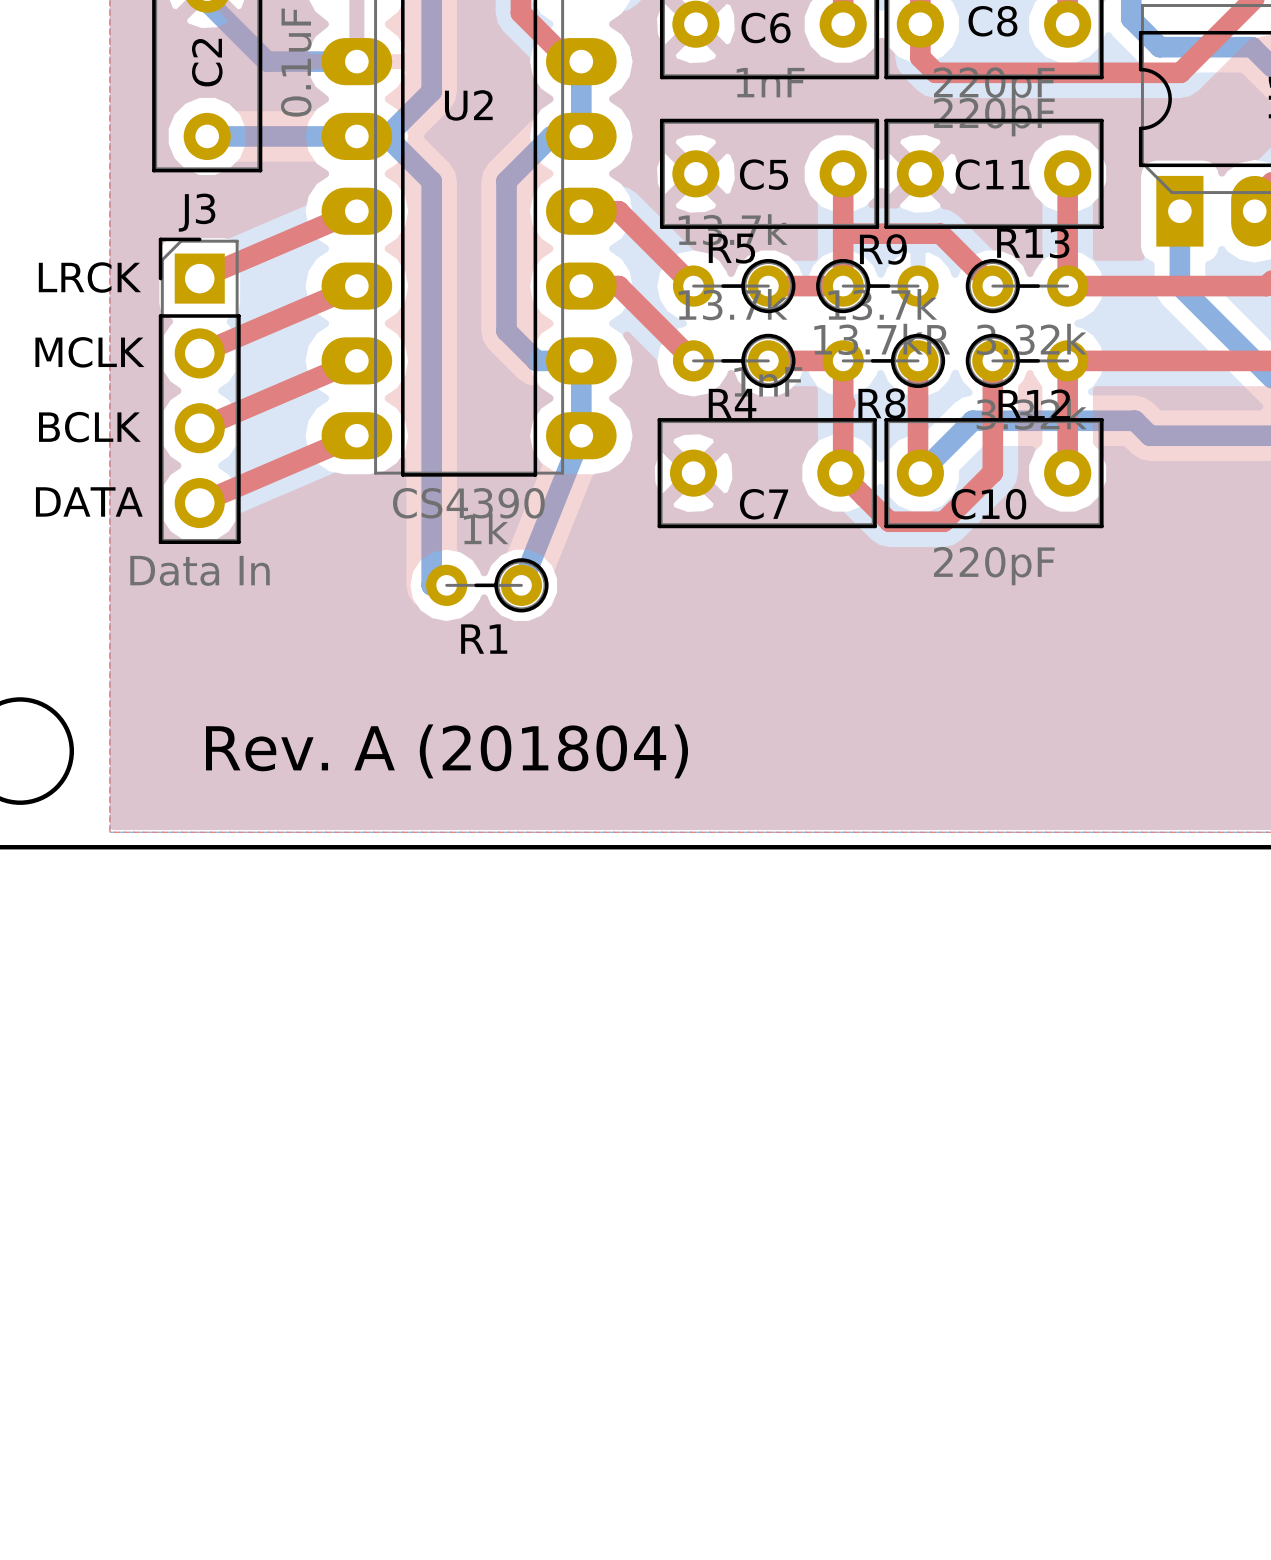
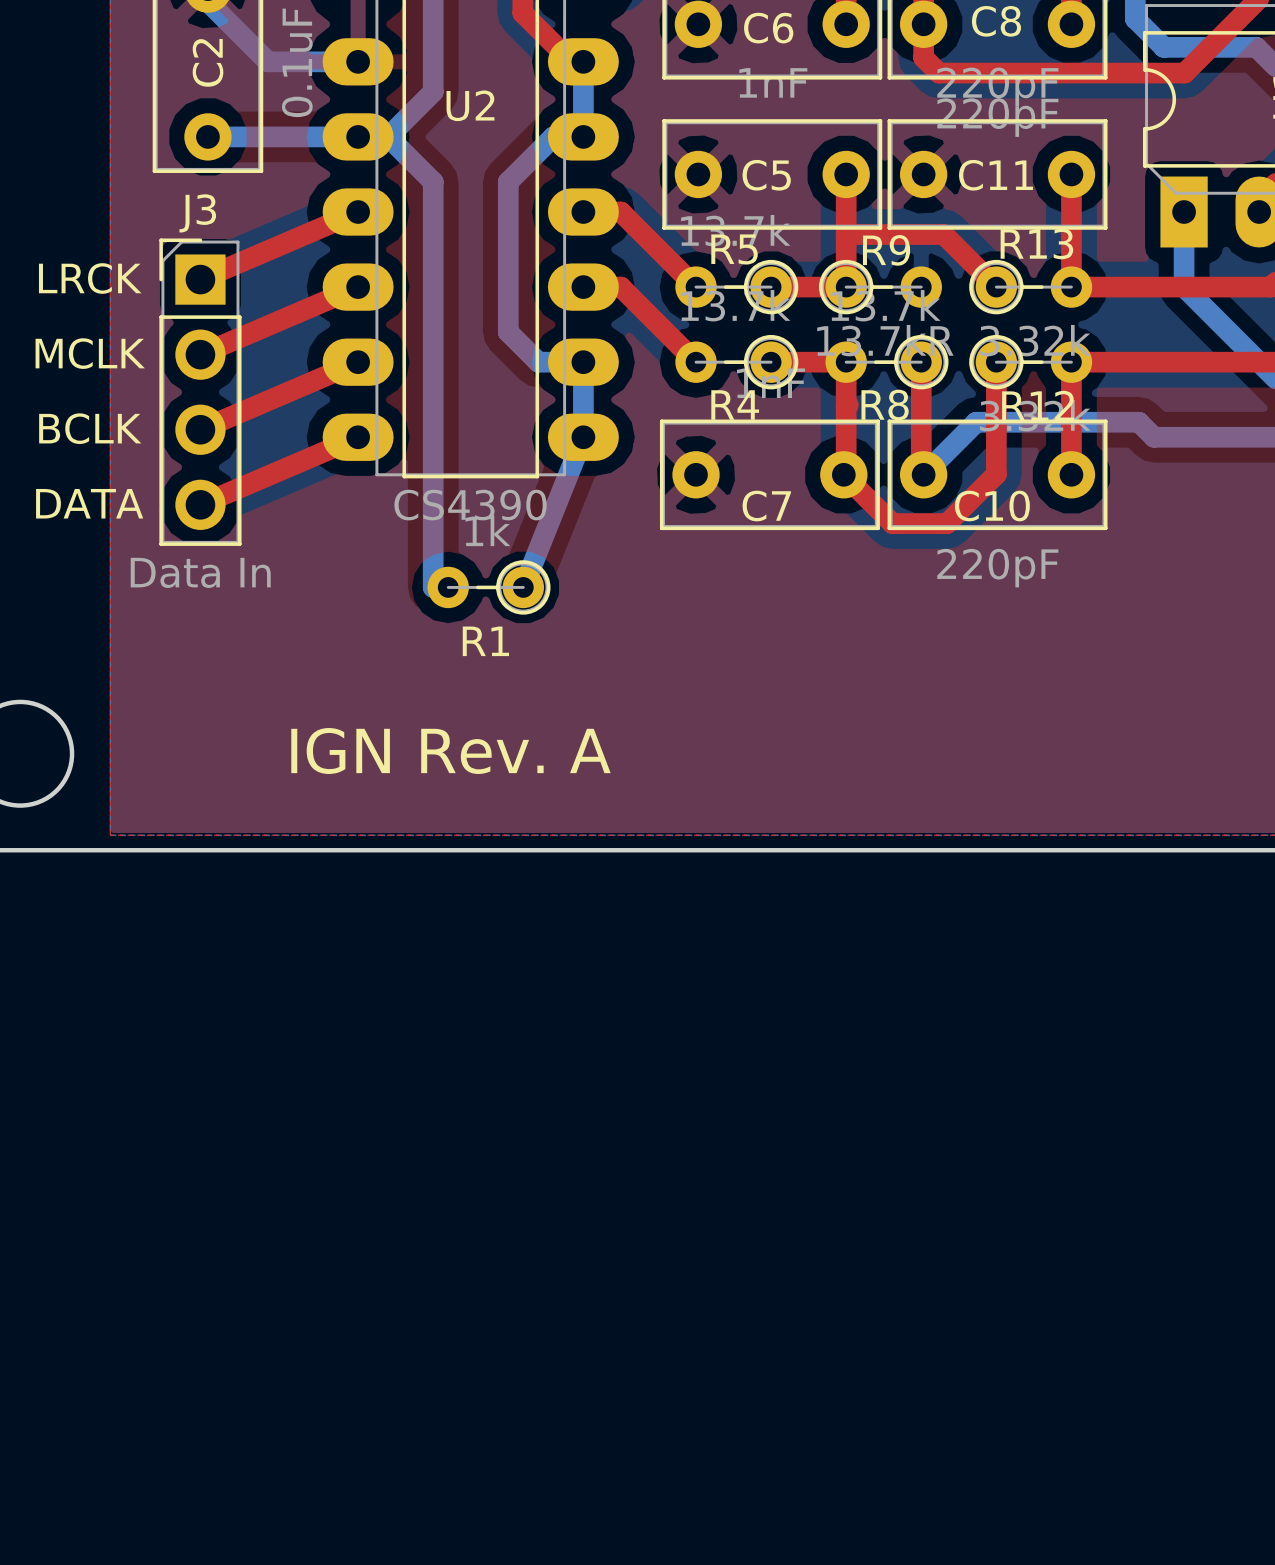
text: Rev. A (201804) (447, 751) -> IGN Rev. A (450, 751)

